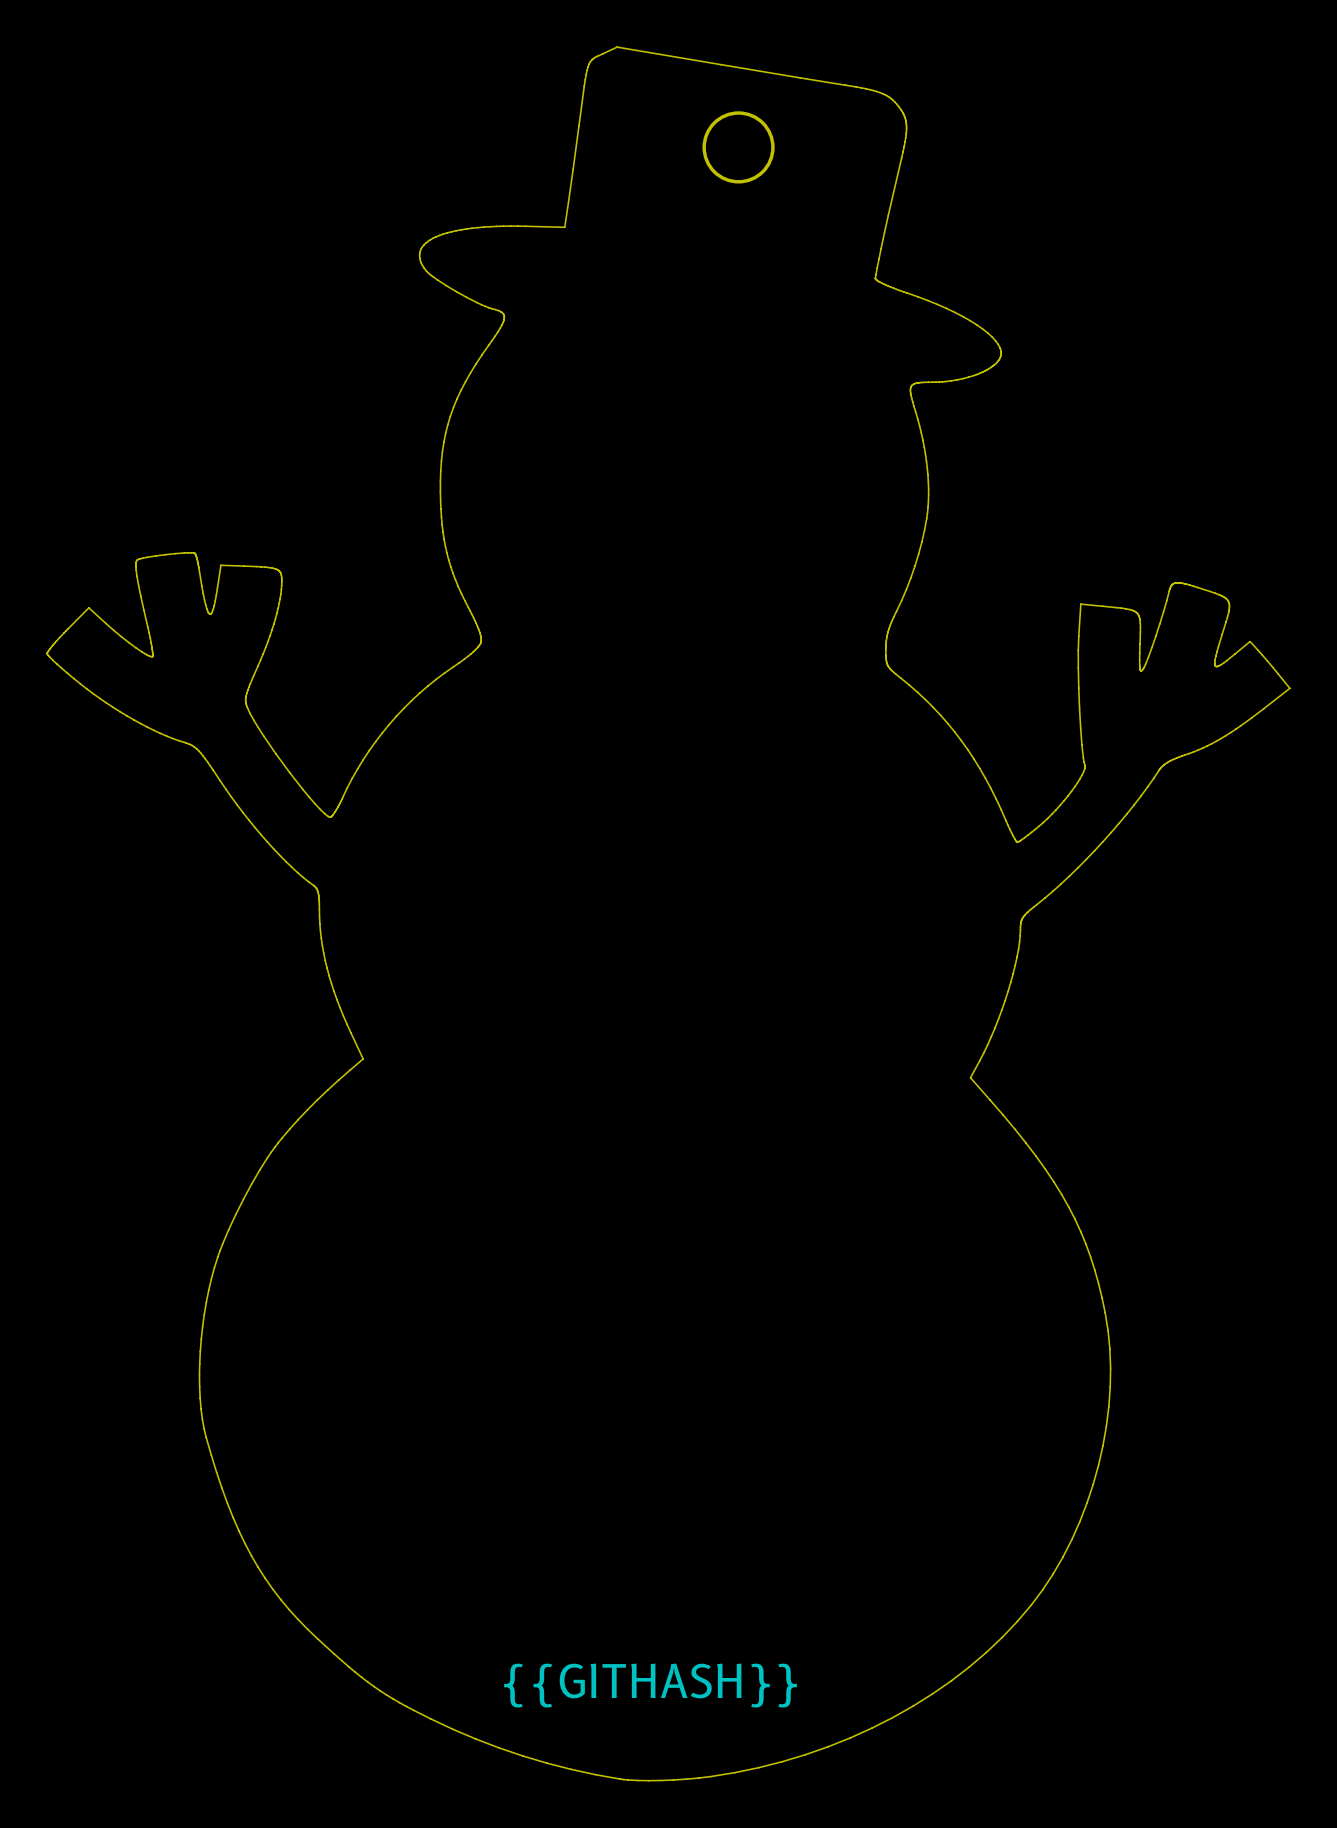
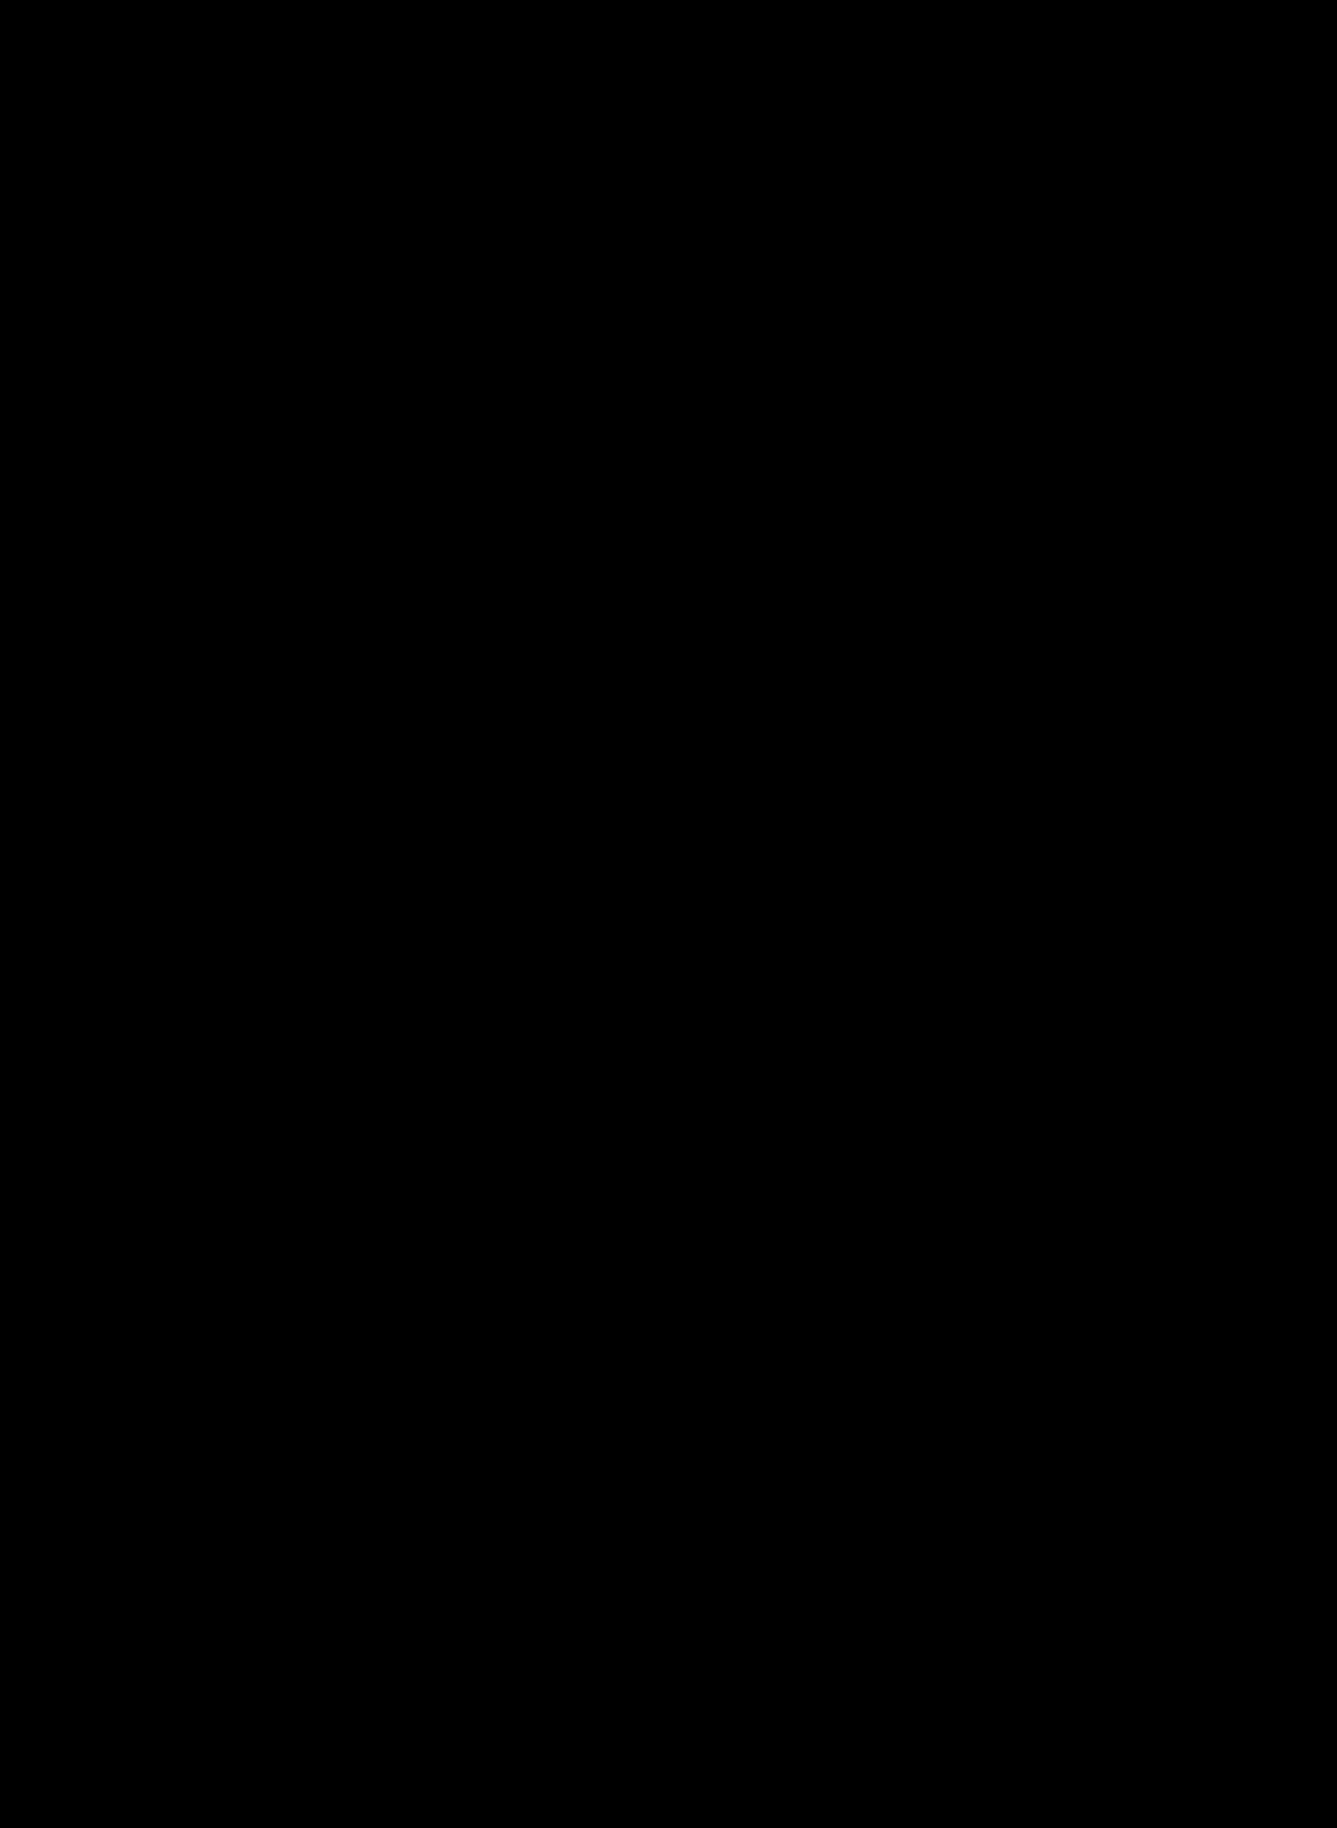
round board edge: [702, 111, 775, 184] -> none
board edge: (875, 278) (906, 132) (904, 115) (891, 98) (879, 92) (861, 87) (617, 47) (591, 59) (585, 79) (564, 227) (503, 226) (461, 229) (433, 238) (423, 245) (420, 251) (421, 262) (430, 274) (466, 297) (500, 311) (504, 316) (500, 328) (470, 372) (457, 398) (447, 424) (441, 461) (440, 508) (445, 546) (452, 573) (477, 625) (481, 641) (470, 653) (419, 693) (389, 724) (363, 759) (331, 816) -> none
board edge: (875, 279) (962, 316) (987, 332) (1000, 349) (1000, 356) (996, 362) (978, 373) (951, 380) (916, 383) (910, 387) (910, 394) (926, 461) (928, 507) (924, 530) (915, 565) (888, 631) (885, 654) (890, 668) (933, 707) (967, 749) (990, 788) (1017, 842) -> none
board edge: (194, 553) (165, 554) (136, 560) (137, 576) (152, 656) -> none
board edge: (195, 553) (205, 605) (210, 614) (214, 605) (220, 565) (268, 567) (276, 569) (280, 573) (281, 589) (276, 613) (267, 641) (247, 690) (246, 703) (258, 727) (289, 772) (315, 803) (330, 817) -> none
board edge: (47, 653) (88, 607) (128, 642) (152, 656) -> none
board edge: (47, 653) (73, 678) (113, 707) (153, 730) (195, 747) (261, 835) (291, 867) (315, 887) (318, 897) (322, 945) (329, 975) (343, 1015) (363, 1058) (307, 1109) (267, 1157) (228, 1229) (217, 1256) (208, 1290) (202, 1326) (199, 1363) (202, 1419) (221, 1488) (238, 1530) (251, 1555) (272, 1589) (307, 1629) (361, 1677) (399, 1702) (453, 1729) (523, 1756) (595, 1774) (623, 1779) (648, 1780) (710, 1776) (782, 1761) (850, 1737) (913, 1706) (969, 1667) (1017, 1621) (1053, 1573) (1079, 1521) (1098, 1465) (1108, 1406) (1109, 1349) (1105, 1312) (1098, 1283) (1080, 1231) (1053, 1181) (1015, 1129) (970, 1077) (991, 1036) (1005, 1000) (1015, 965) (1020, 922) (1024, 916) (1069, 876) (1102, 841) (1134, 805) (1162, 765) (1225, 735) (1289, 688) (1250, 641) (1223, 662) (1215, 666) (1215, 656) (1228, 610) (1228, 602) (1218, 594) (1180, 583) (1174, 583) (1170, 587) (1151, 647) (1141, 670) -> none
board edge: (1140, 670) (1140, 623) (1137, 613) (1125, 608) (1080, 604) (1078, 688) (1084, 769) (1074, 786) (1056, 809) (1039, 826) (1017, 842) -> none
text: {{GITHASH}} (650, 1685) -> none

